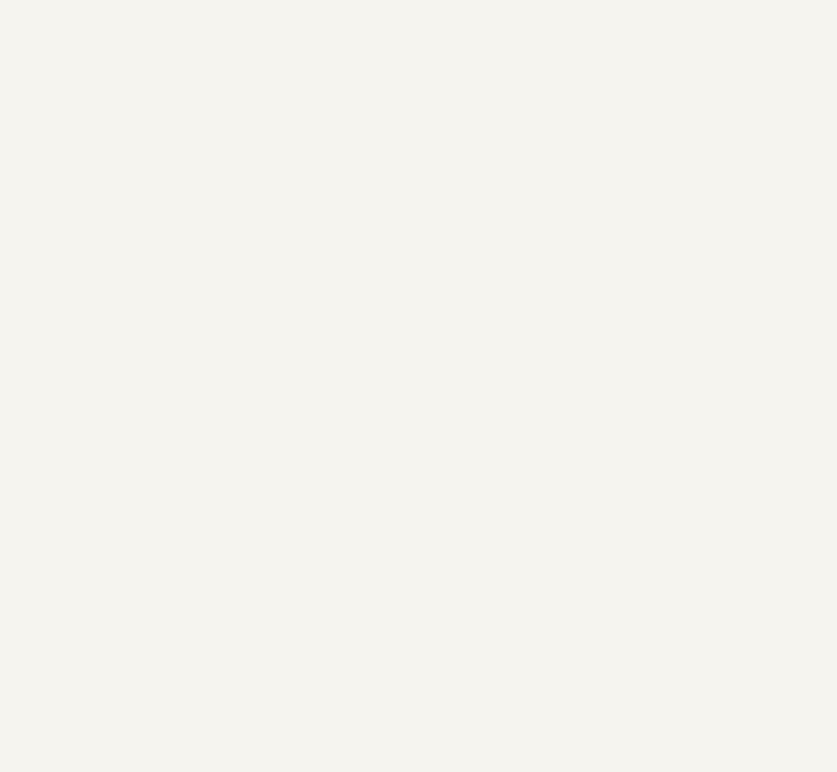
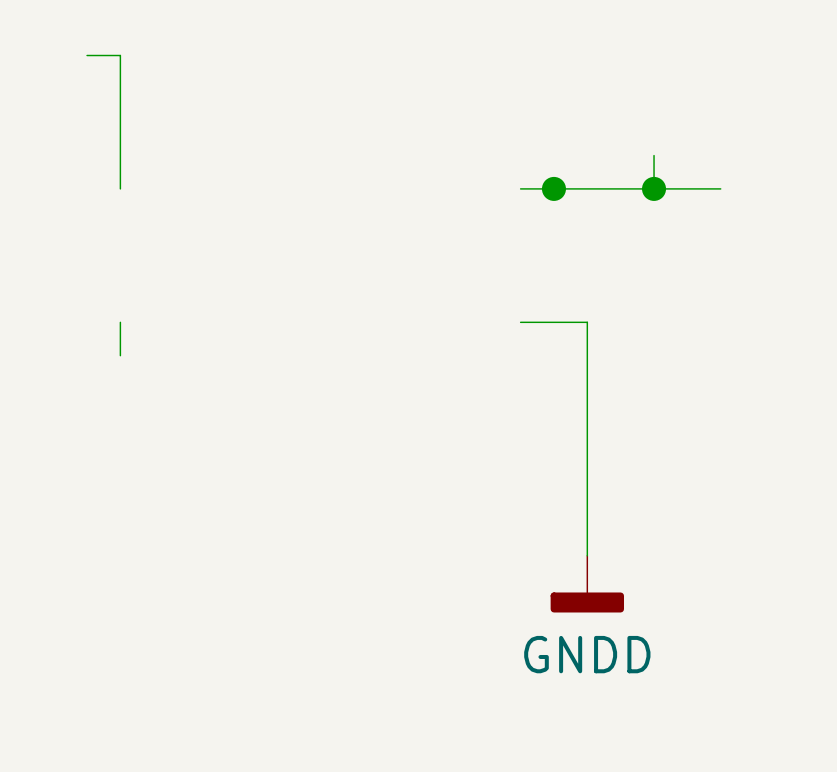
wire: none -> (87, 55) (120, 55) (120, 188)
wire: none -> (654, 155) (654, 188)
wire: none -> (520, 188) (720, 188)
junction: none -> (553, 188)
junction: none -> (654, 188)
wire: none -> (120, 322) (120, 355)
wire: none -> (520, 322) (587, 322) (587, 555)
power symbol: none -> GNDD (587, 584)

